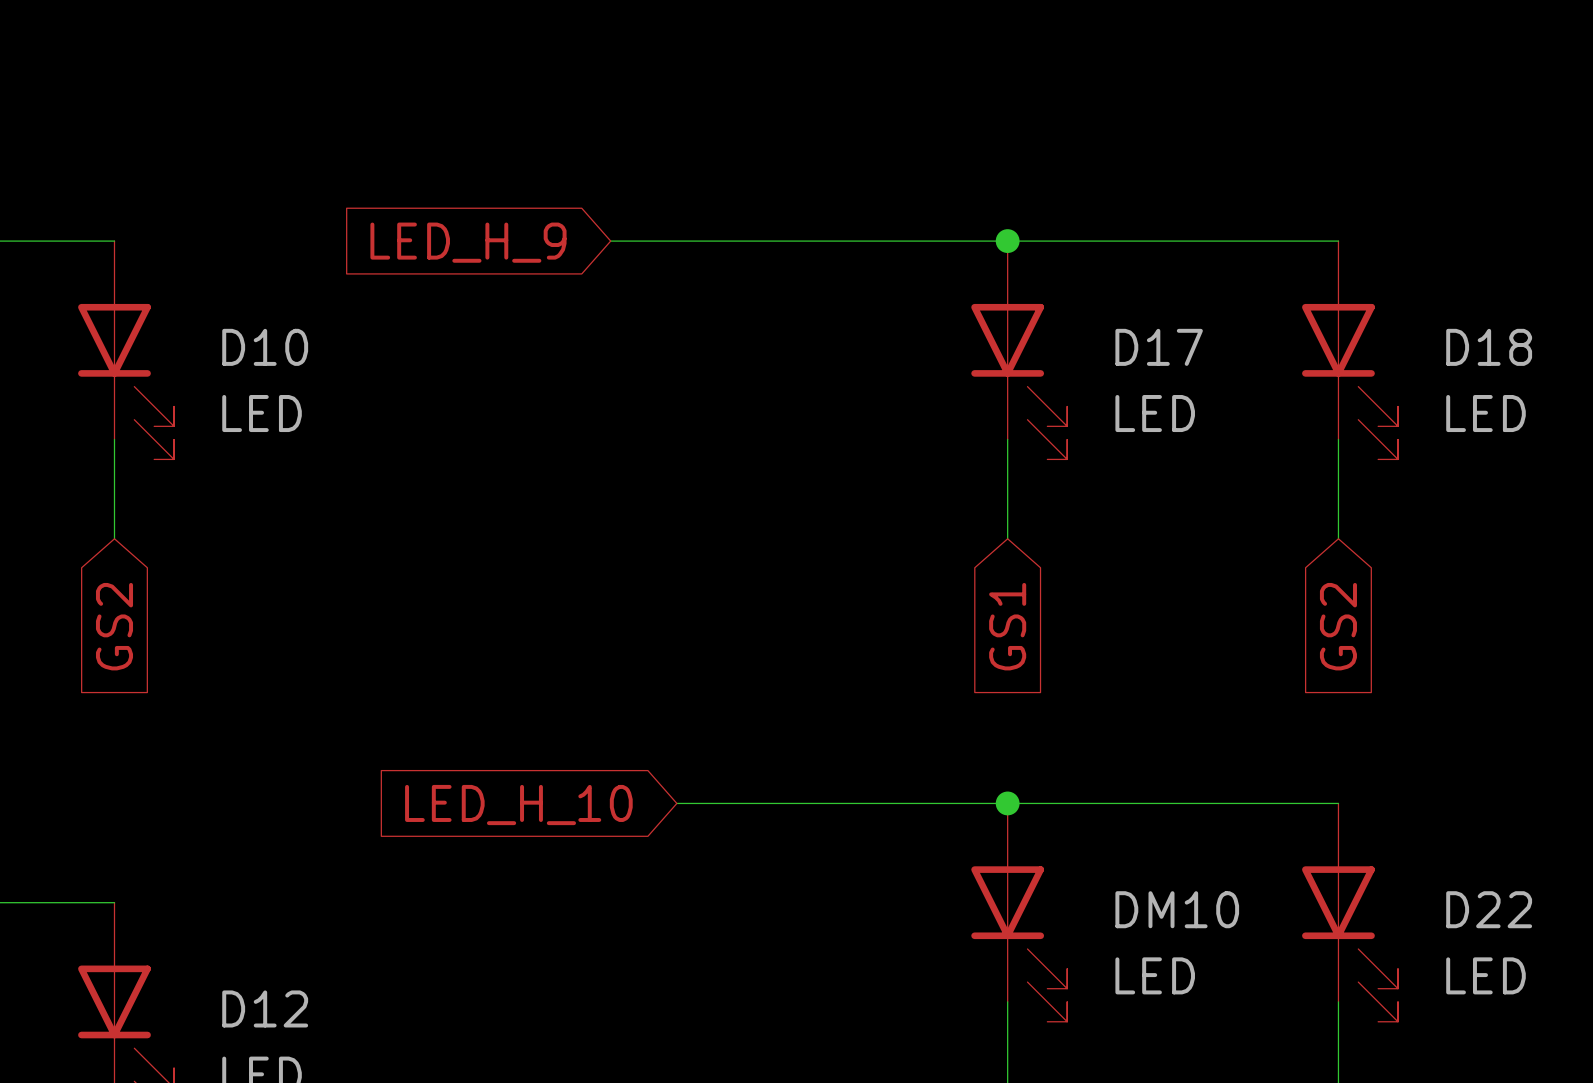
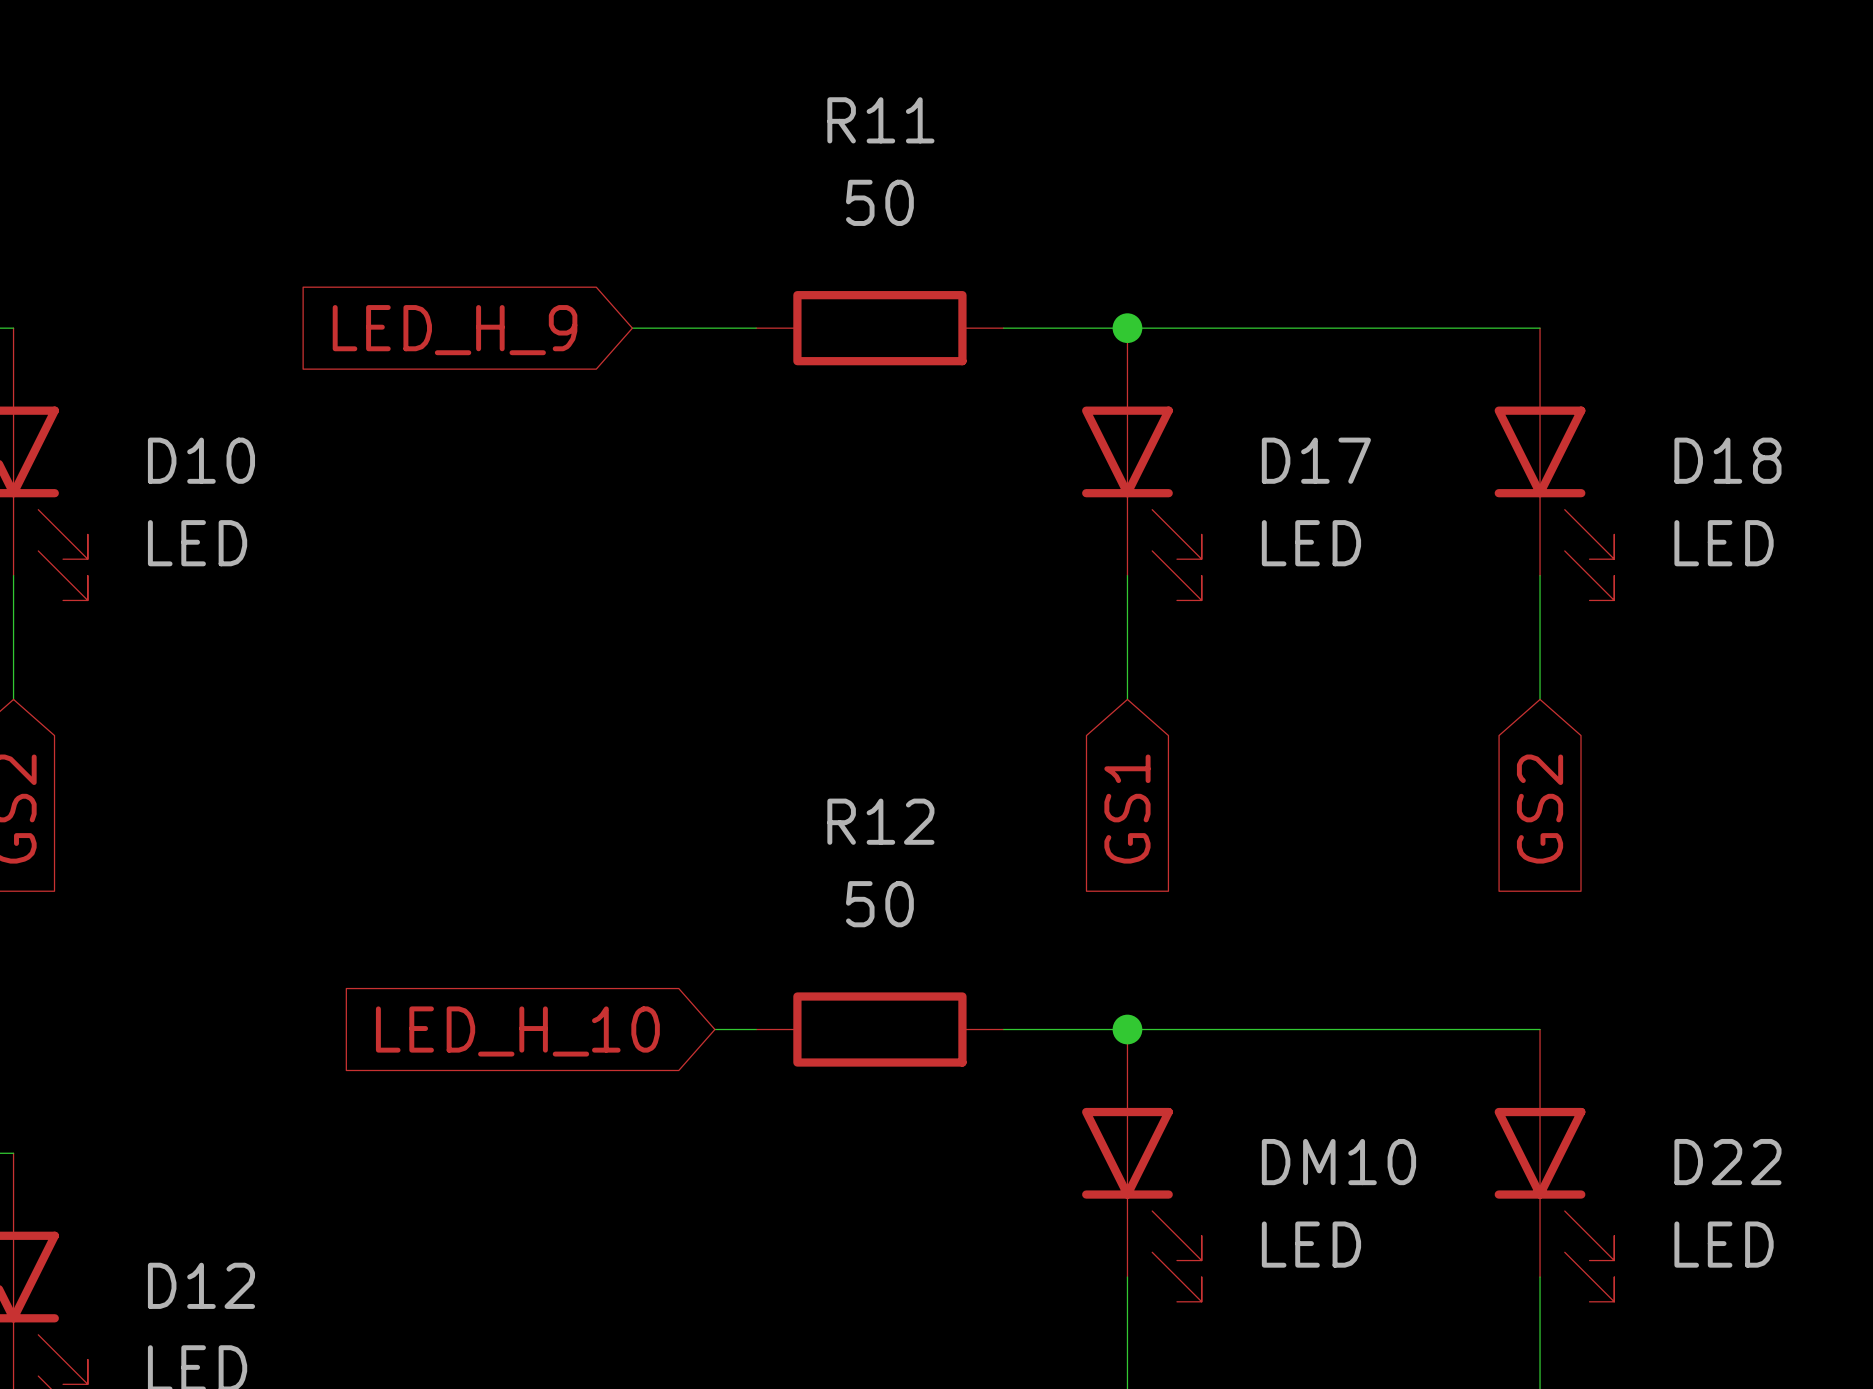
wire: (709, 241) (908, 241) -> none
R11: none -> 50 (879, 328)
wire: (709, 803) (908, 803) -> none
R12: none -> 50 (879, 1029)

